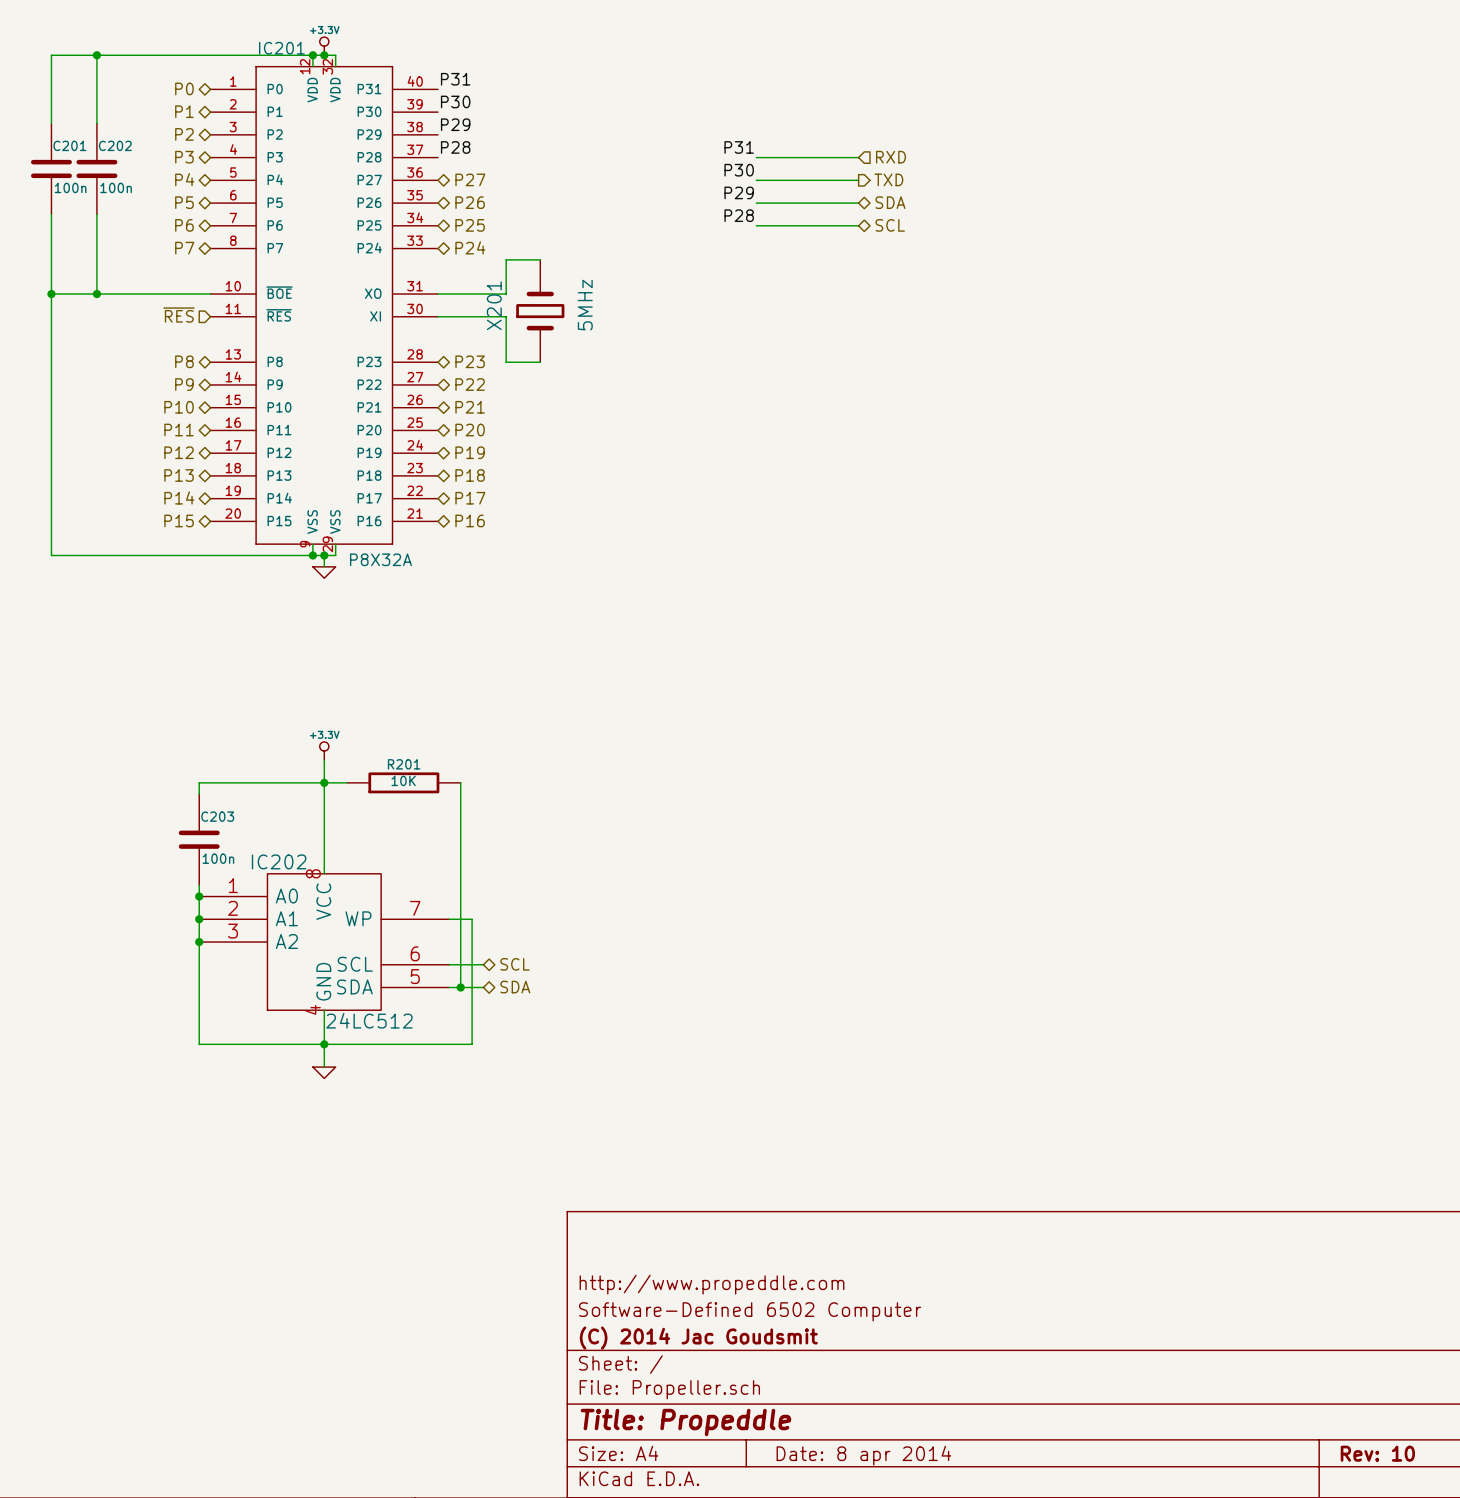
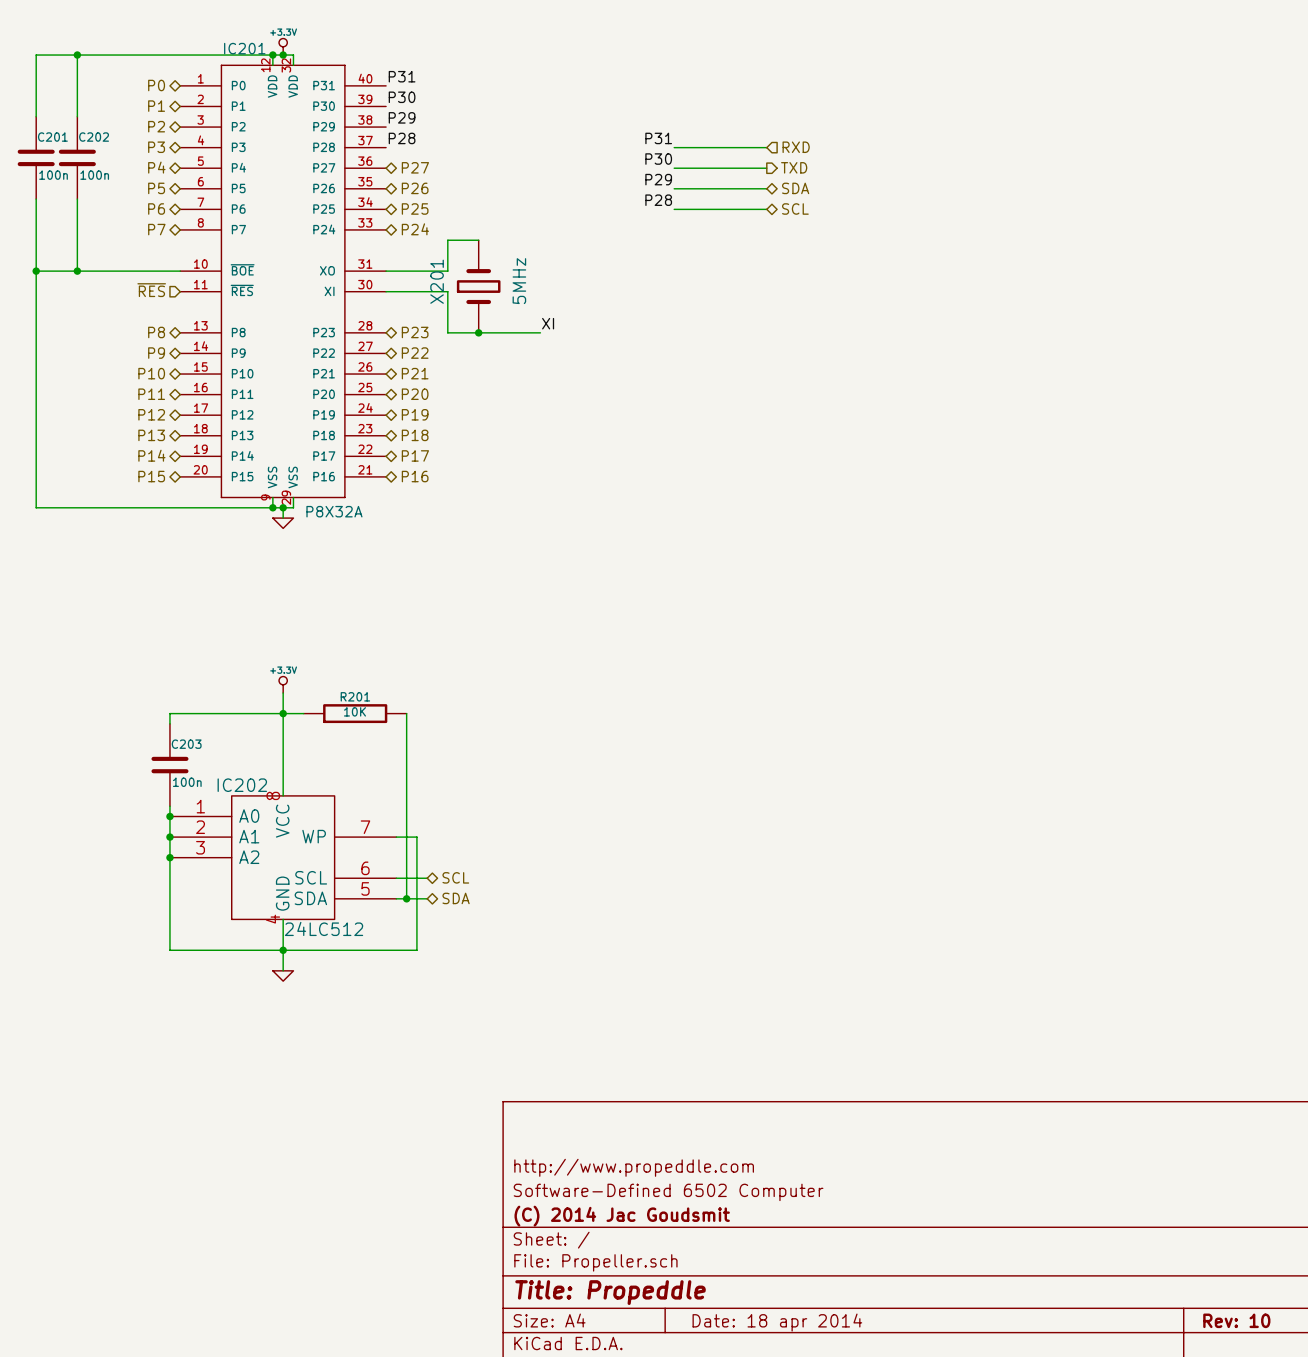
label: none -> XI (548, 323)
wire: none -> (478, 332) (540, 332)
junction: none -> (478, 332)
title block: Date: 8 apr 2014 (863, 1455) -> Date: 18 apr 2014 (777, 1322)

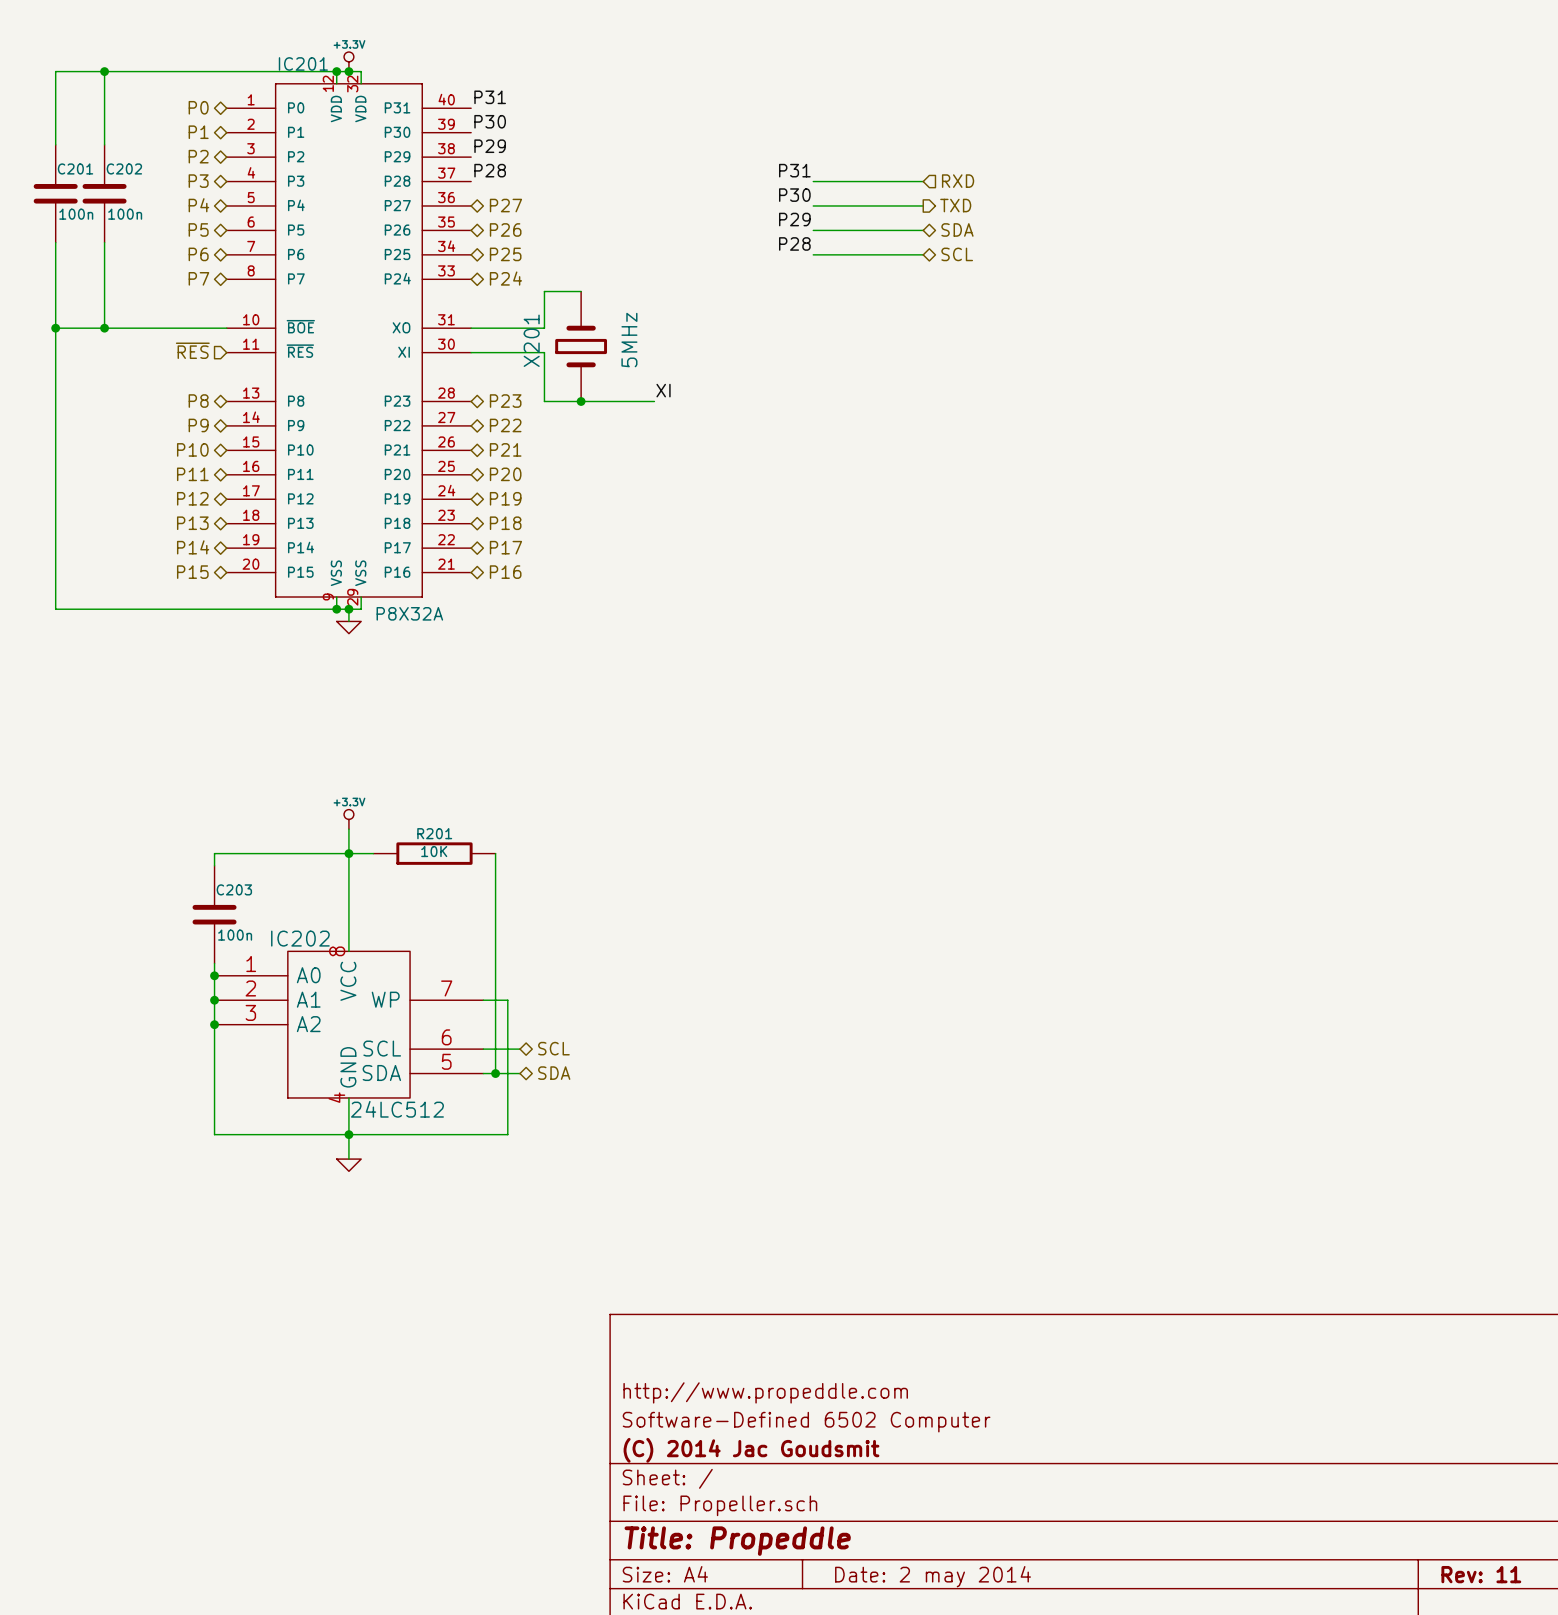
title block: Rev: 10 (1236, 1320) -> Rev: 11 (1481, 1574)
title block: Date: 18 apr 2014 (777, 1322) -> Date: 2 may 2014 (933, 1576)

